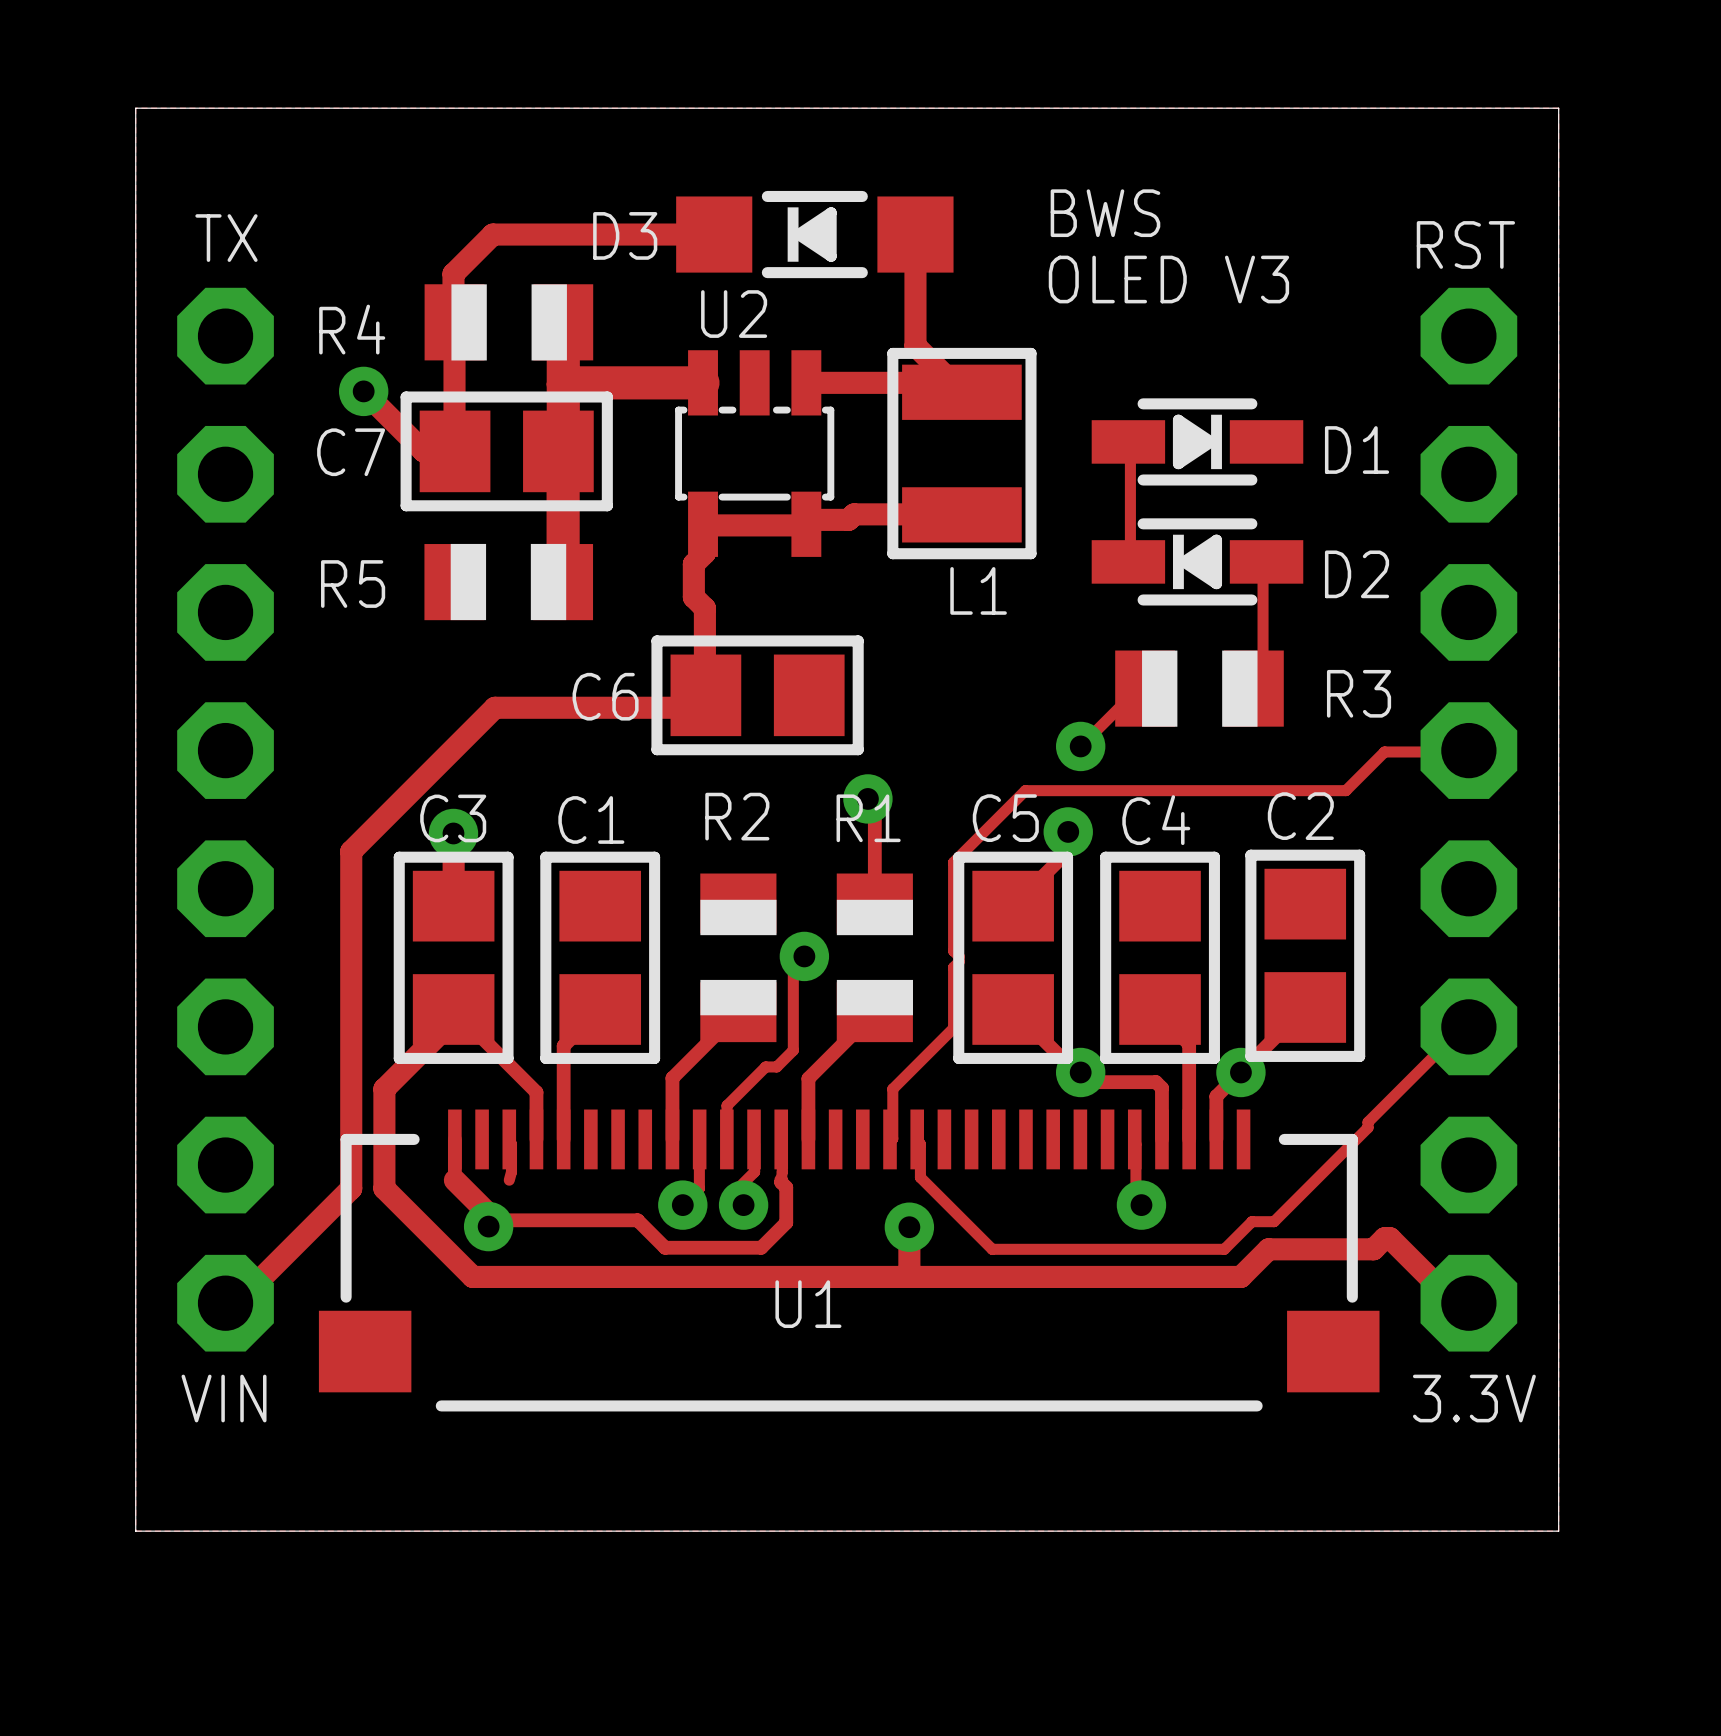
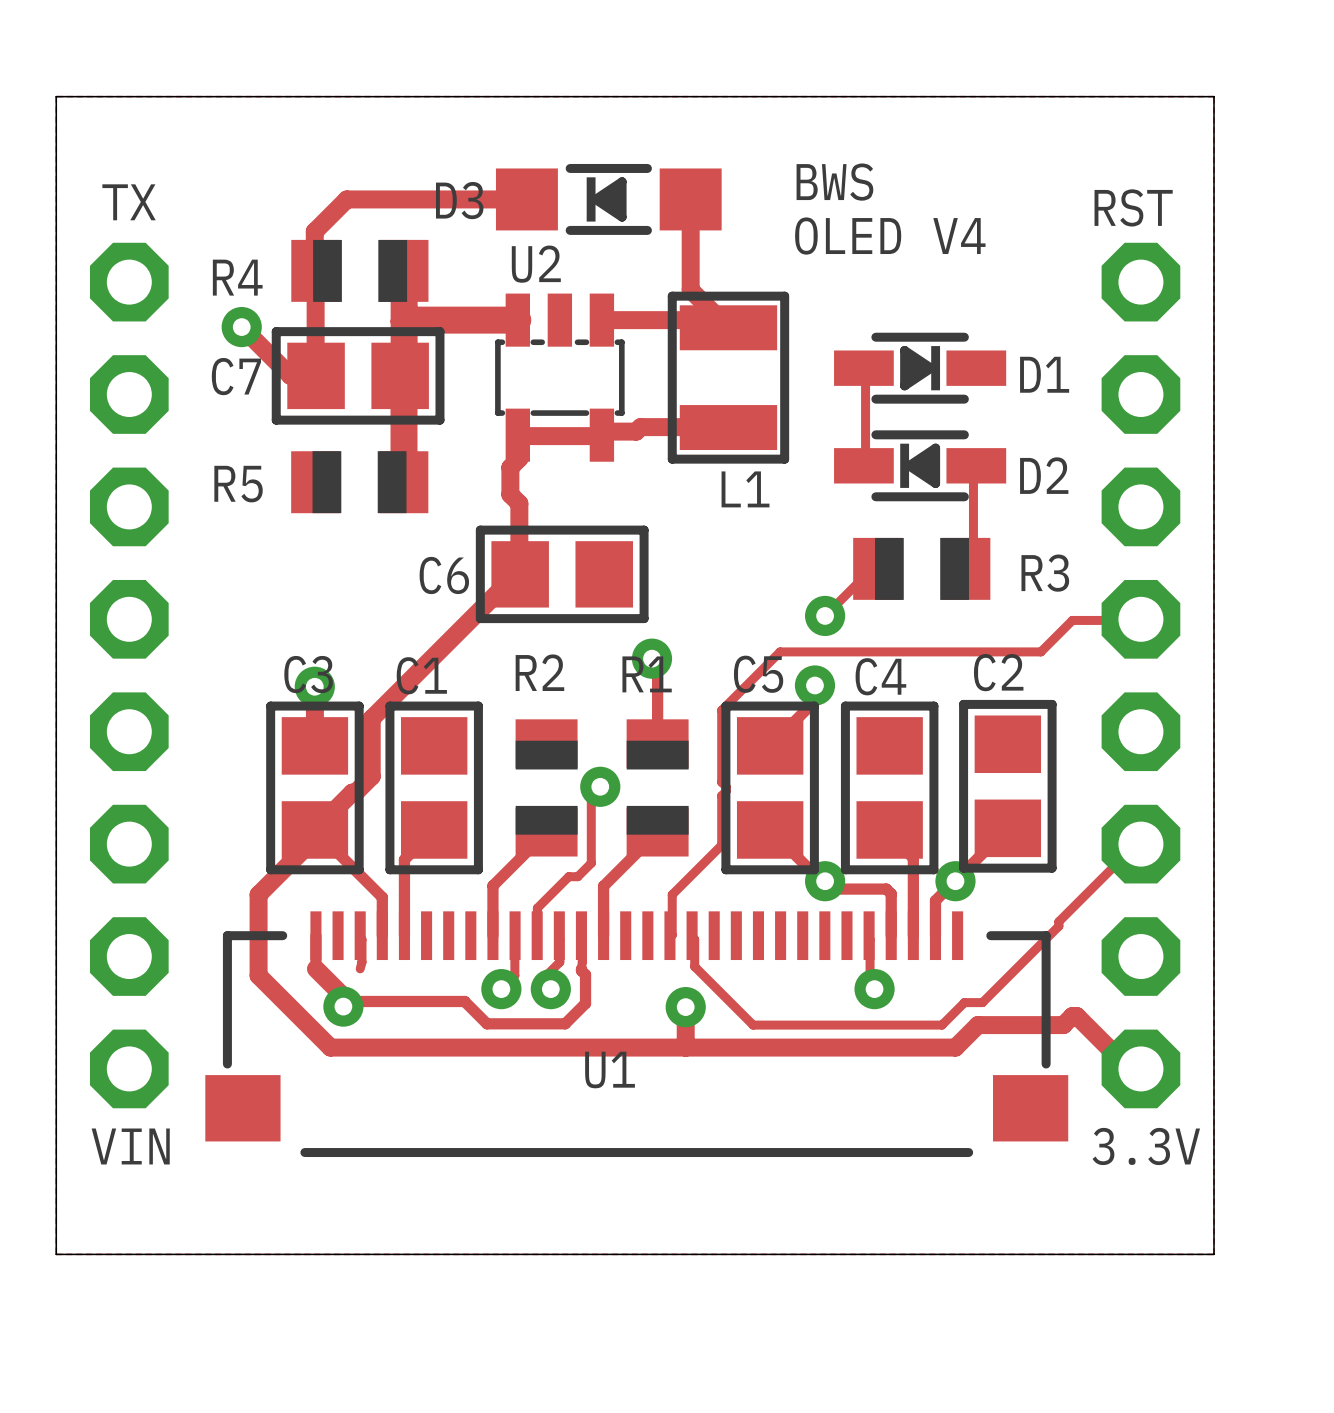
text: OLED V3 (1168, 279) -> OLED V4 (890, 236)
track: none -> (519, 570) (371, 718) (371, 776) (355, 792) (352, 792) (314, 829)
track: (705, 695) (693, 707) (494, 707) (351, 851) (351, 1188) (240, 1299) (229, 1299) (225, 1303) -> none

